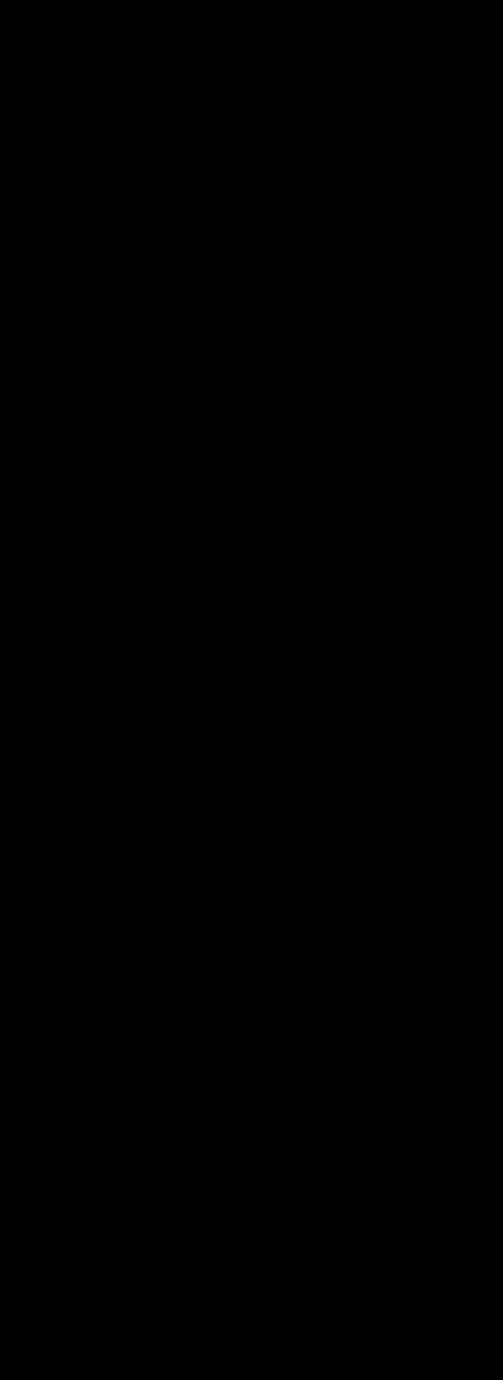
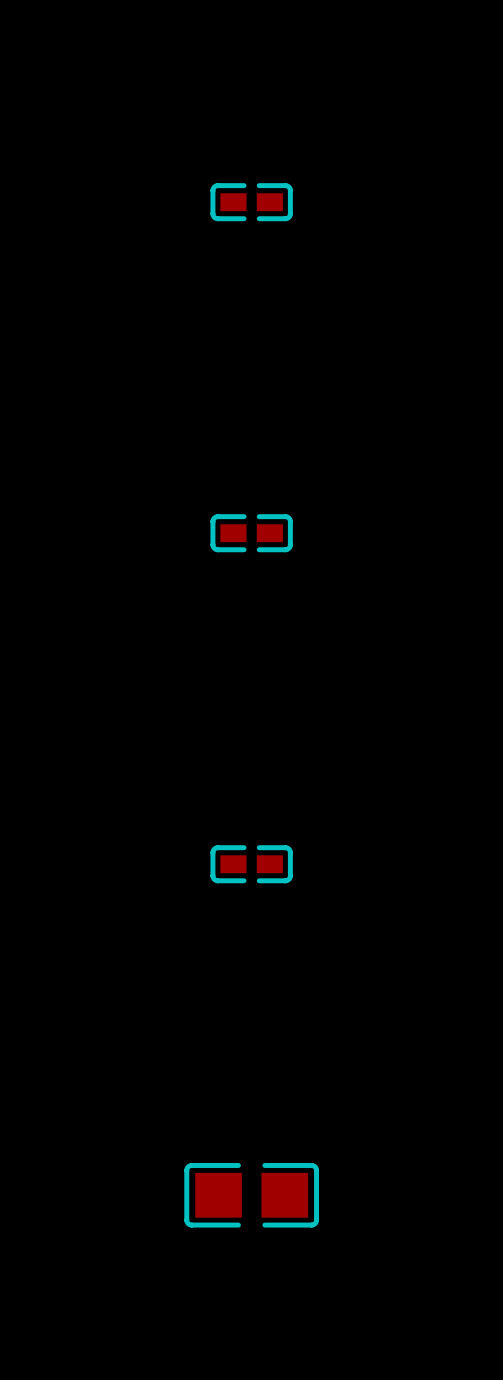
part: none -> (251, 202)
part: none -> (251, 533)
part: none -> (251, 864)
part: none -> (251, 1195)

